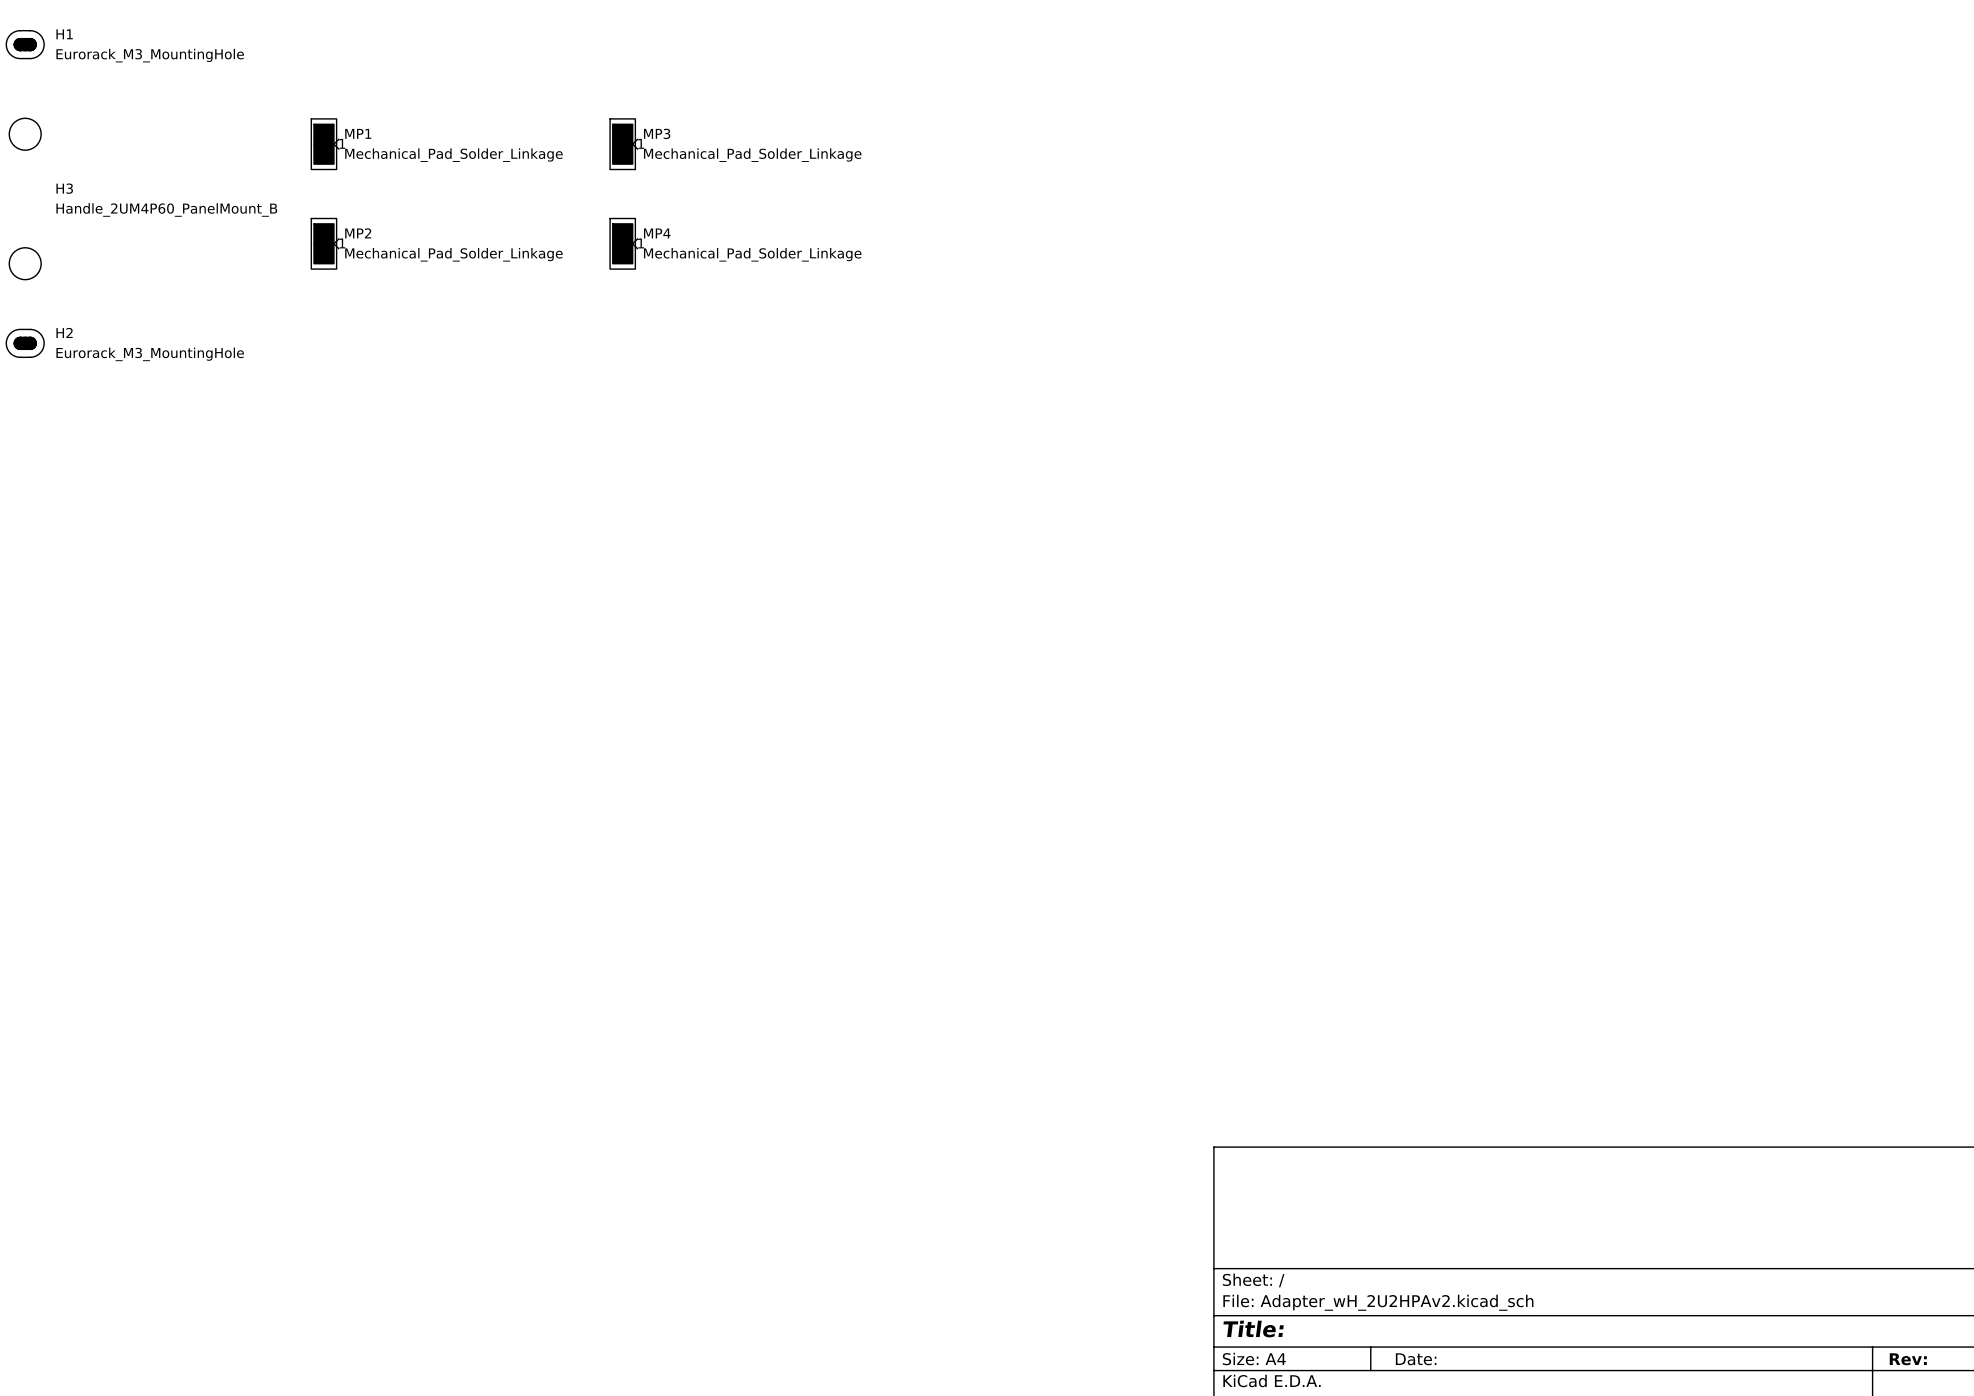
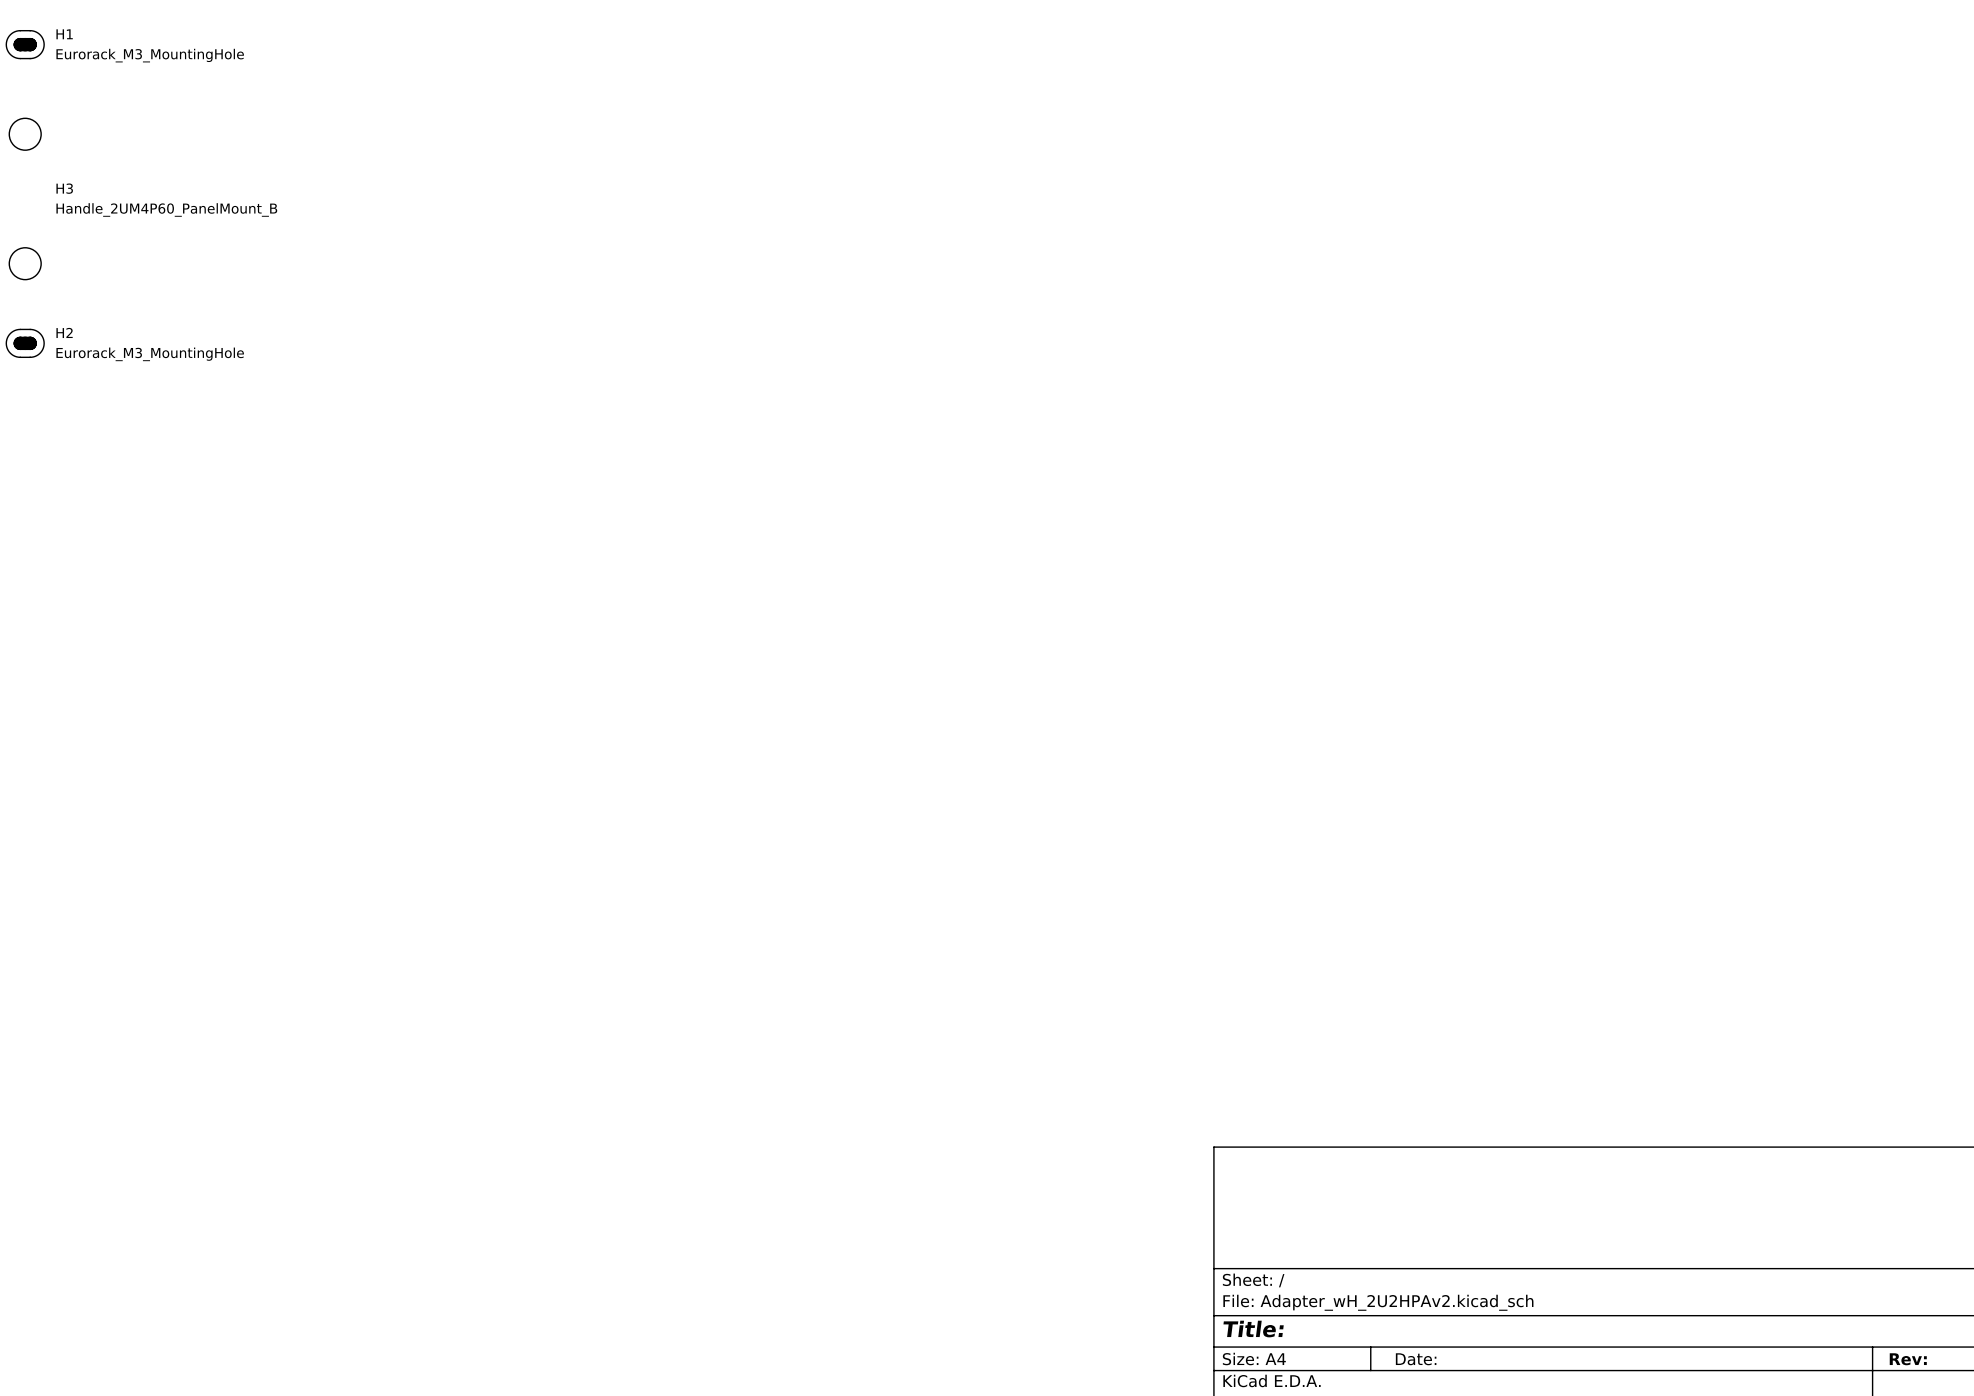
MP1: Mechanical_Pad_Solder_Linkage (325, 144) -> none
MP3: Mechanical_Pad_Solder_Linkage (623, 144) -> none
MP2: Mechanical_Pad_Solder_Linkage (325, 243) -> none
MP4: Mechanical_Pad_Solder_Linkage (623, 243) -> none

